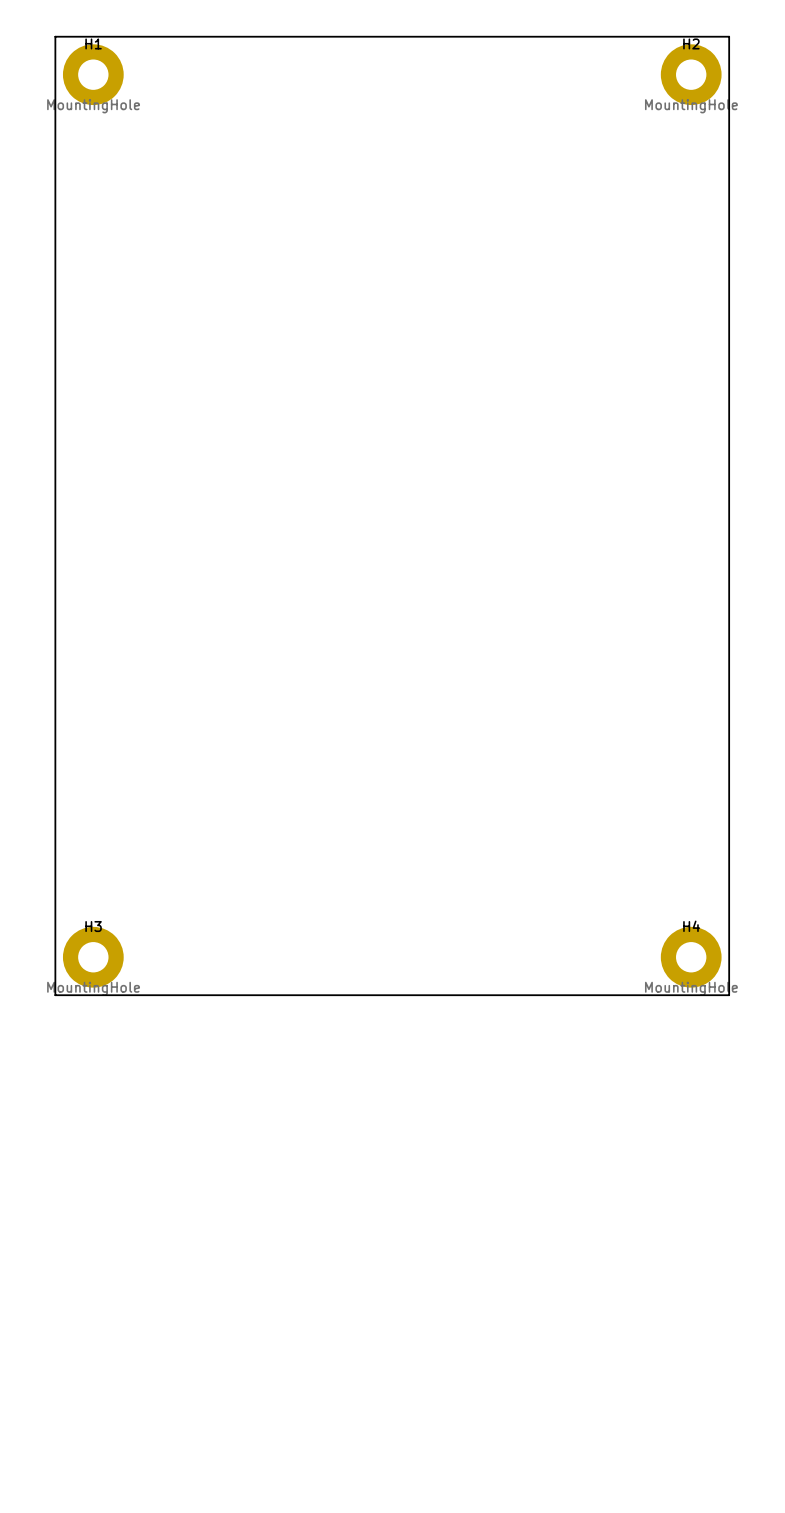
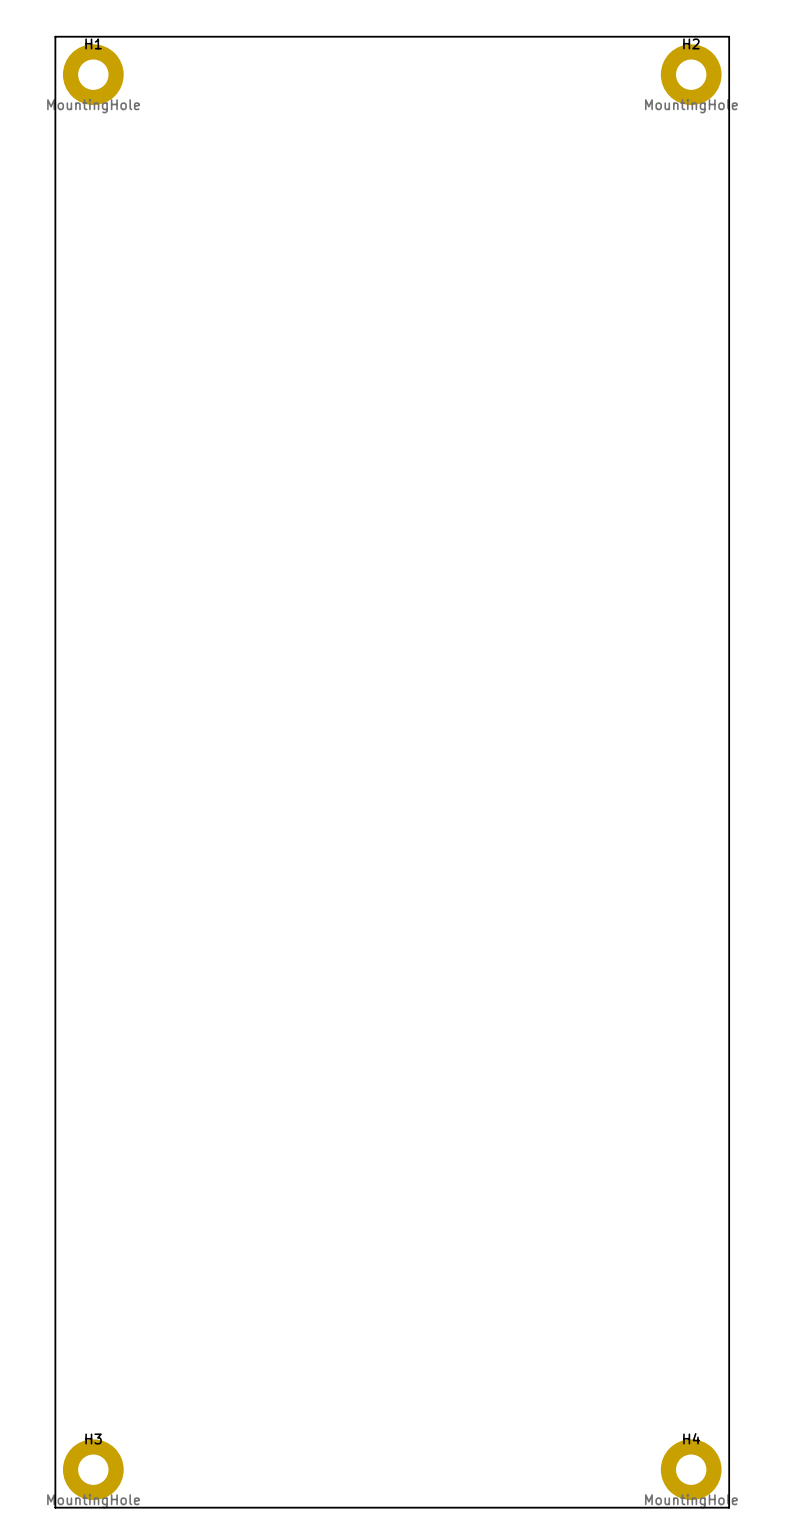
H3 position: (93, 957) -> (93, 1469)
H4 position: (691, 957) -> (691, 1469)
board edge: (55, 995) (729, 995) -> (55, 995) (55, 1507) (729, 1507) (729, 995)

